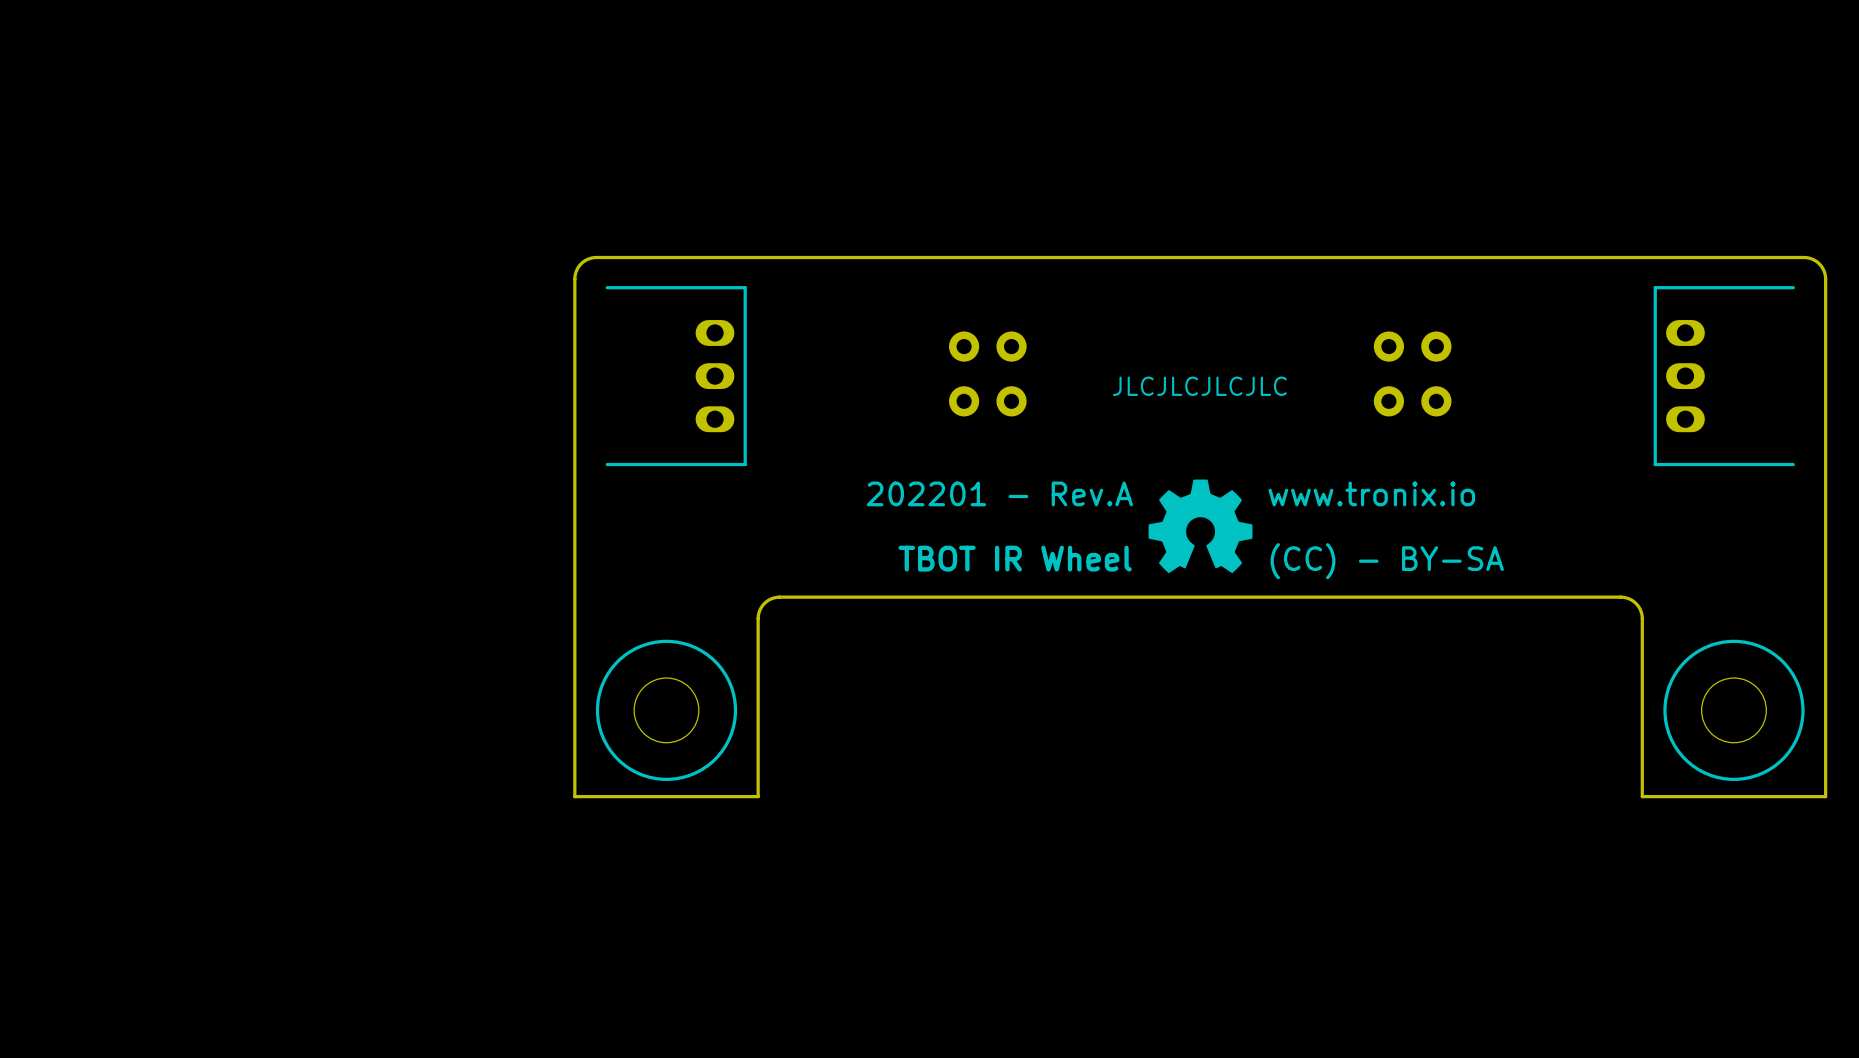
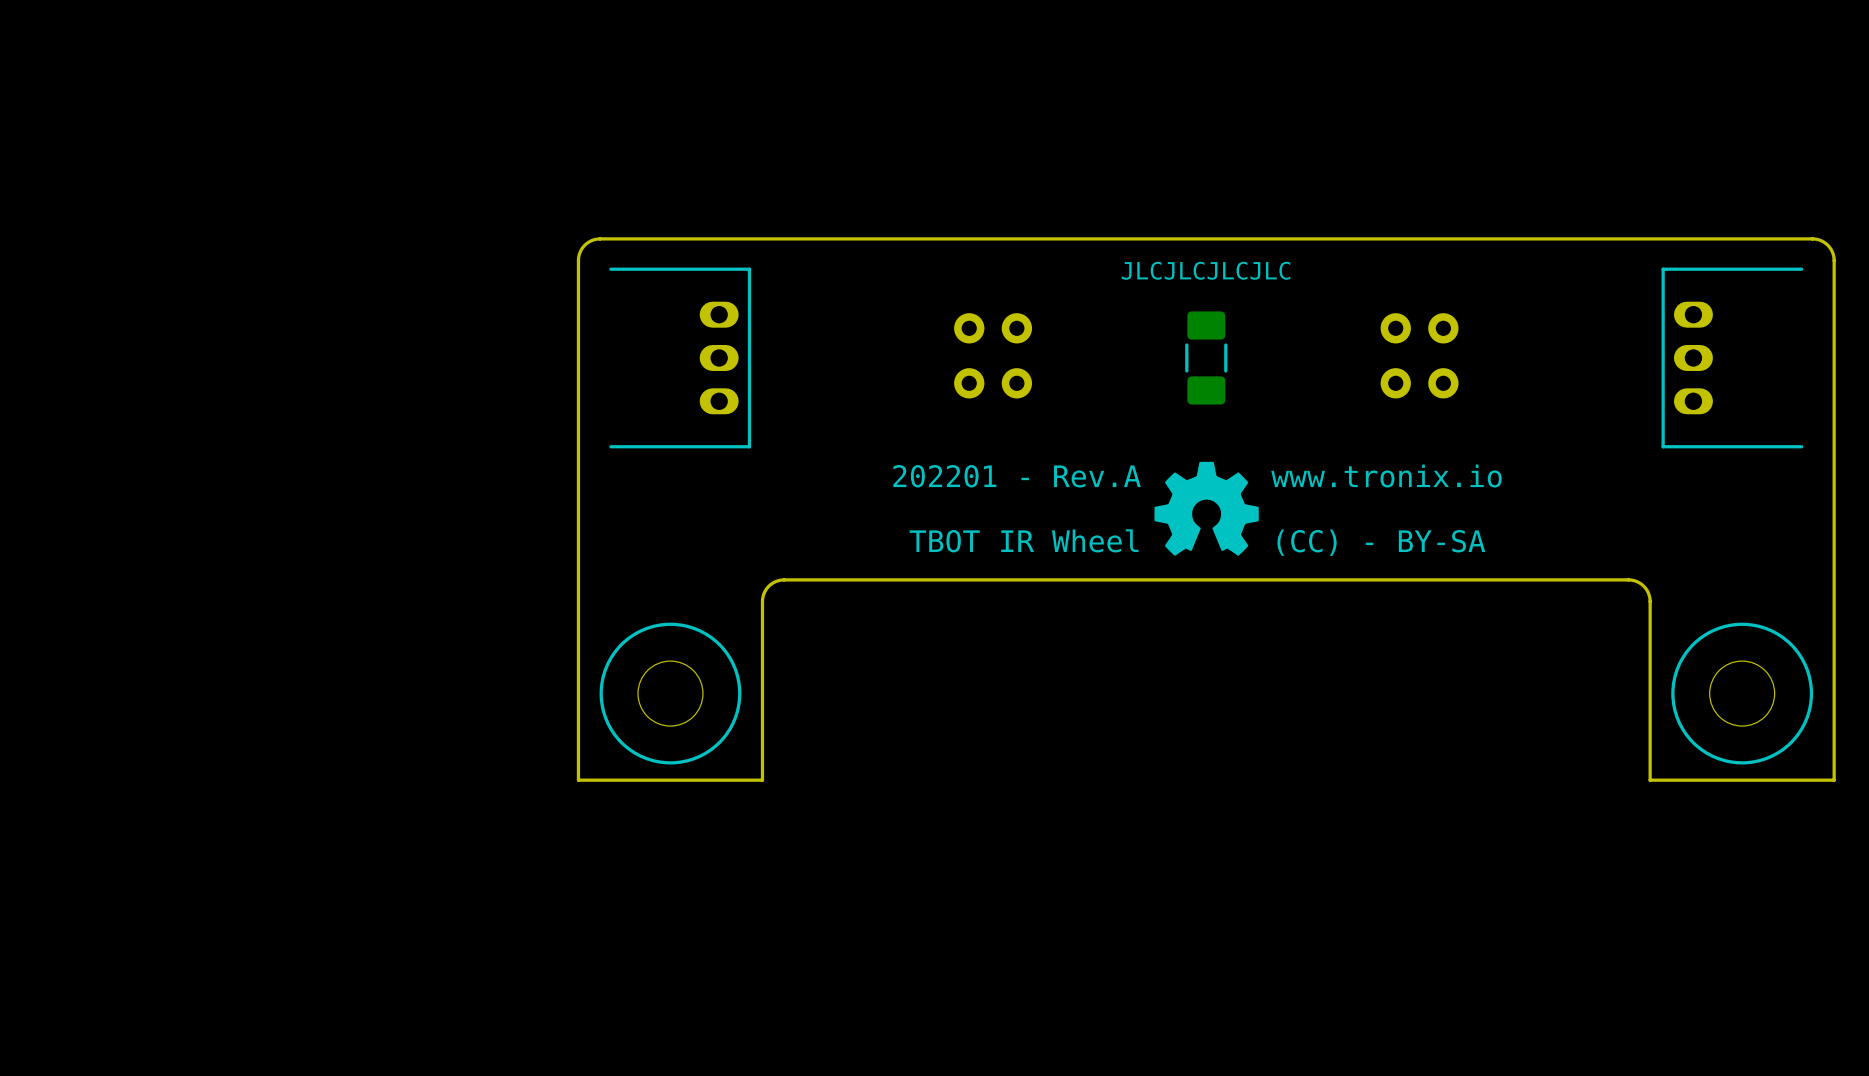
part: none -> (1206, 357)
text position: JLCJLCJLCJLC (1199, 386) -> JLCJLCJLCJLC (1206, 270)

